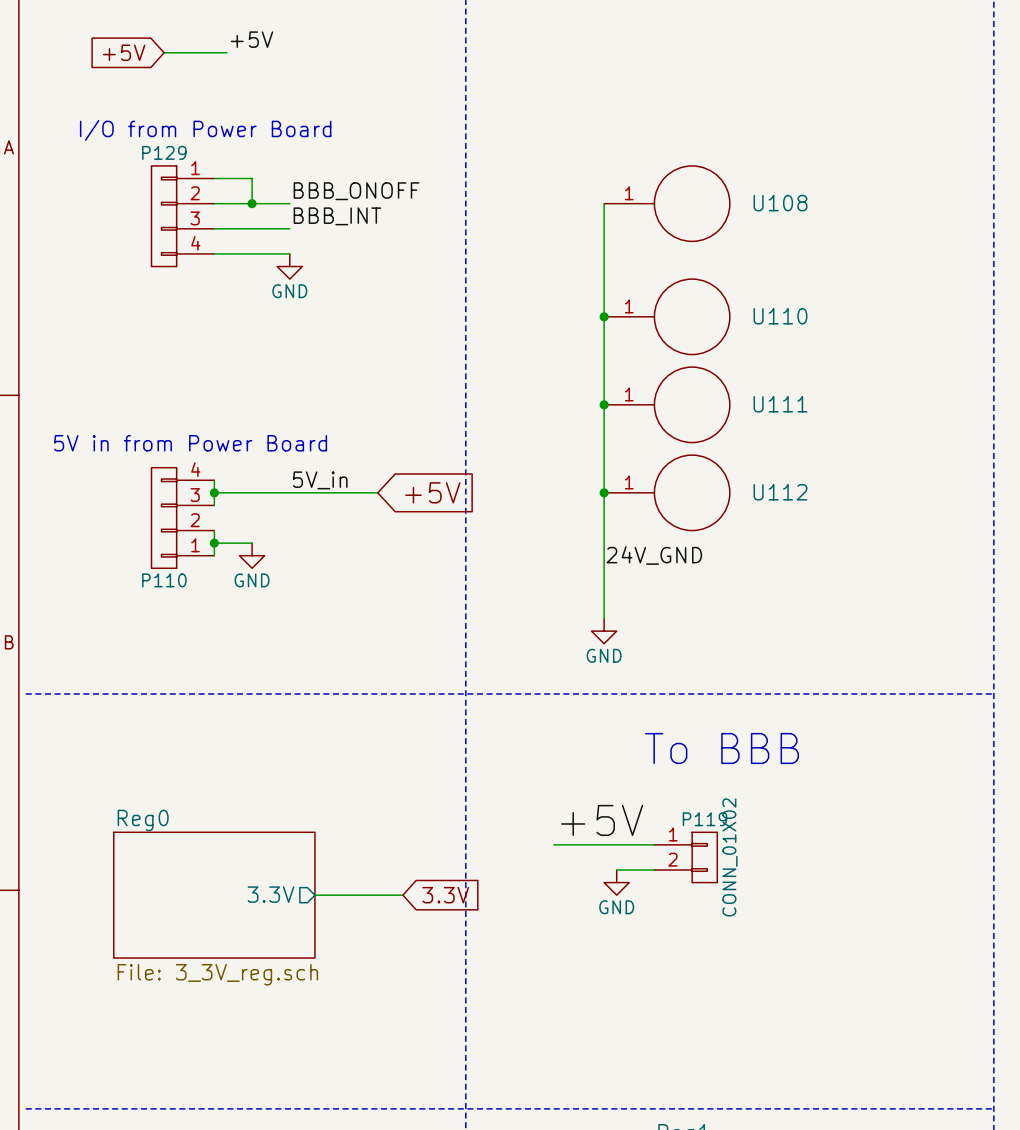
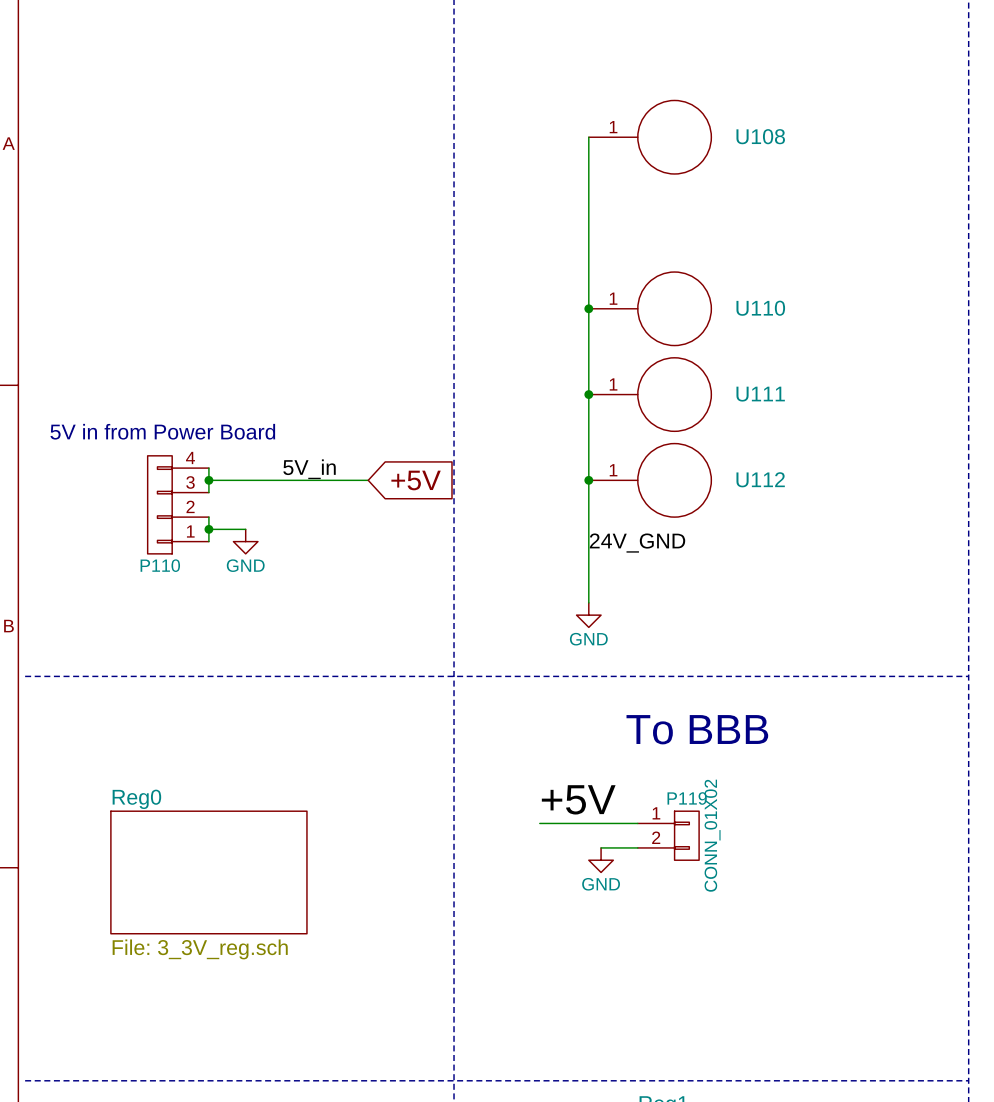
label: +5V (252, 39) -> none
global label: +5V (124, 52) -> none
wire: (164, 52) (226, 52) -> none
text: I/O from Power Board (205, 130) -> none
wire: none -> (588, 137) (588, 198)
wire: (214, 178) (252, 178) (252, 203) -> none
label: BBB_ONOFF (356, 191) -> none
wire: (214, 203) (289, 203) -> none
junction: (252, 203) -> none
U108 position: (666, 203) -> (650, 137)
P129: (182, 216) -> none
label: BBB_INT (337, 216) -> none
wire: (214, 228) (289, 228) -> none
wire: (214, 253) (289, 253) -> none
power symbol: GND (289, 266) -> none
sheet pin: 3.3V (271, 894) -> none
wire: (314, 895) (402, 895) -> none
global label: 3.3V (445, 895) -> none

